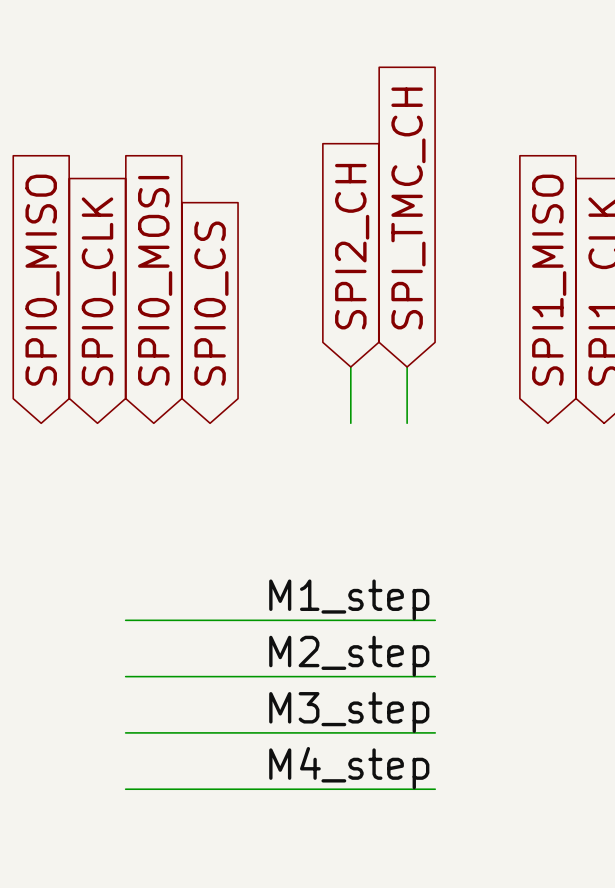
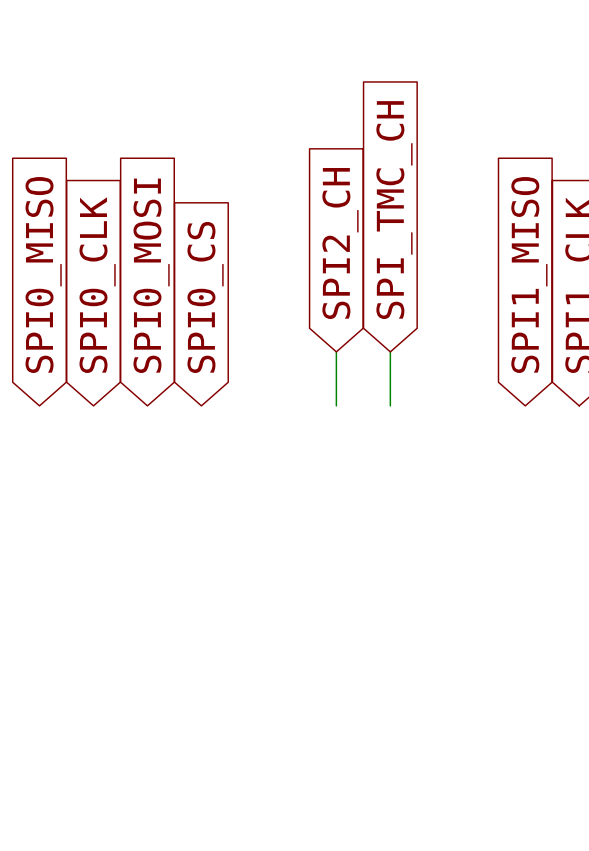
label: M1_step (349, 599) -> none
wire: (125, 620) (435, 620) -> none
label: M2_step (349, 656) -> none
wire: (125, 676) (435, 676) -> none
label: M3_step (349, 712) -> none
wire: (125, 732) (435, 732) -> none
label: M4_step (349, 768) -> none
wire: (125, 789) (435, 789) -> none

